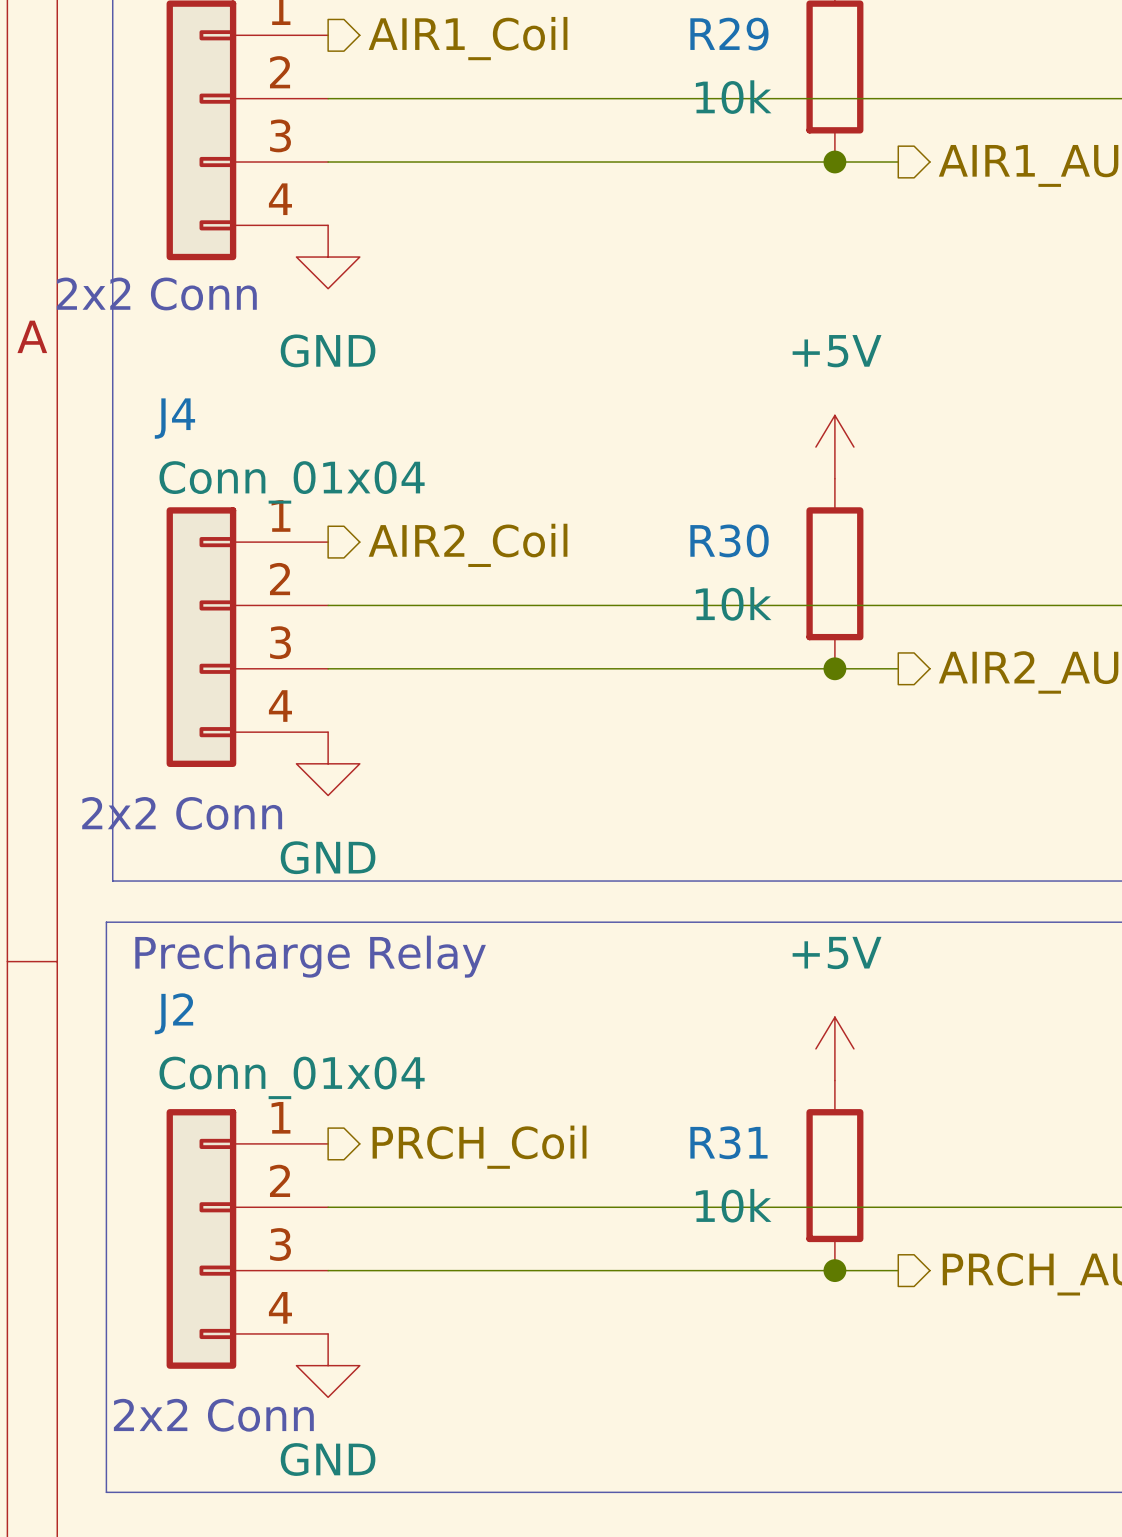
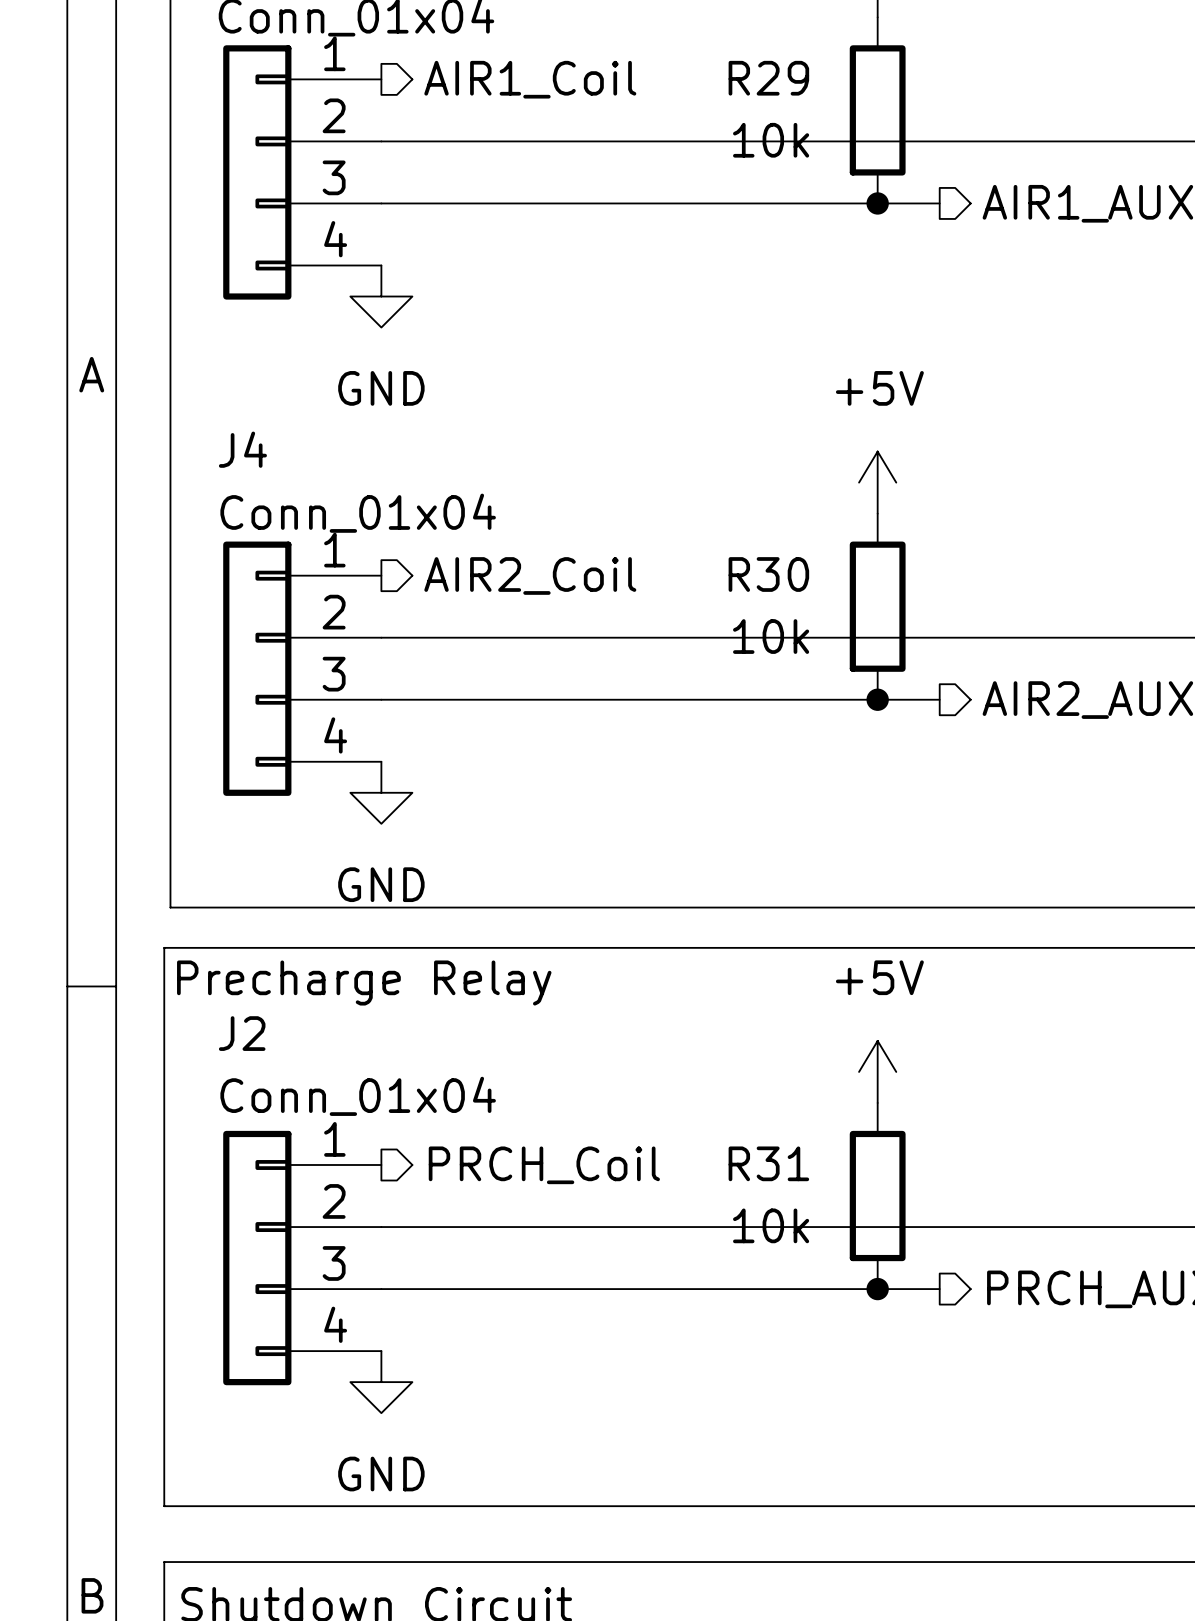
text: 2x2 Conn (156, 293) -> none
text: 2x2 Conn (182, 813) -> none
text: 2x2 Conn (213, 1415) -> none

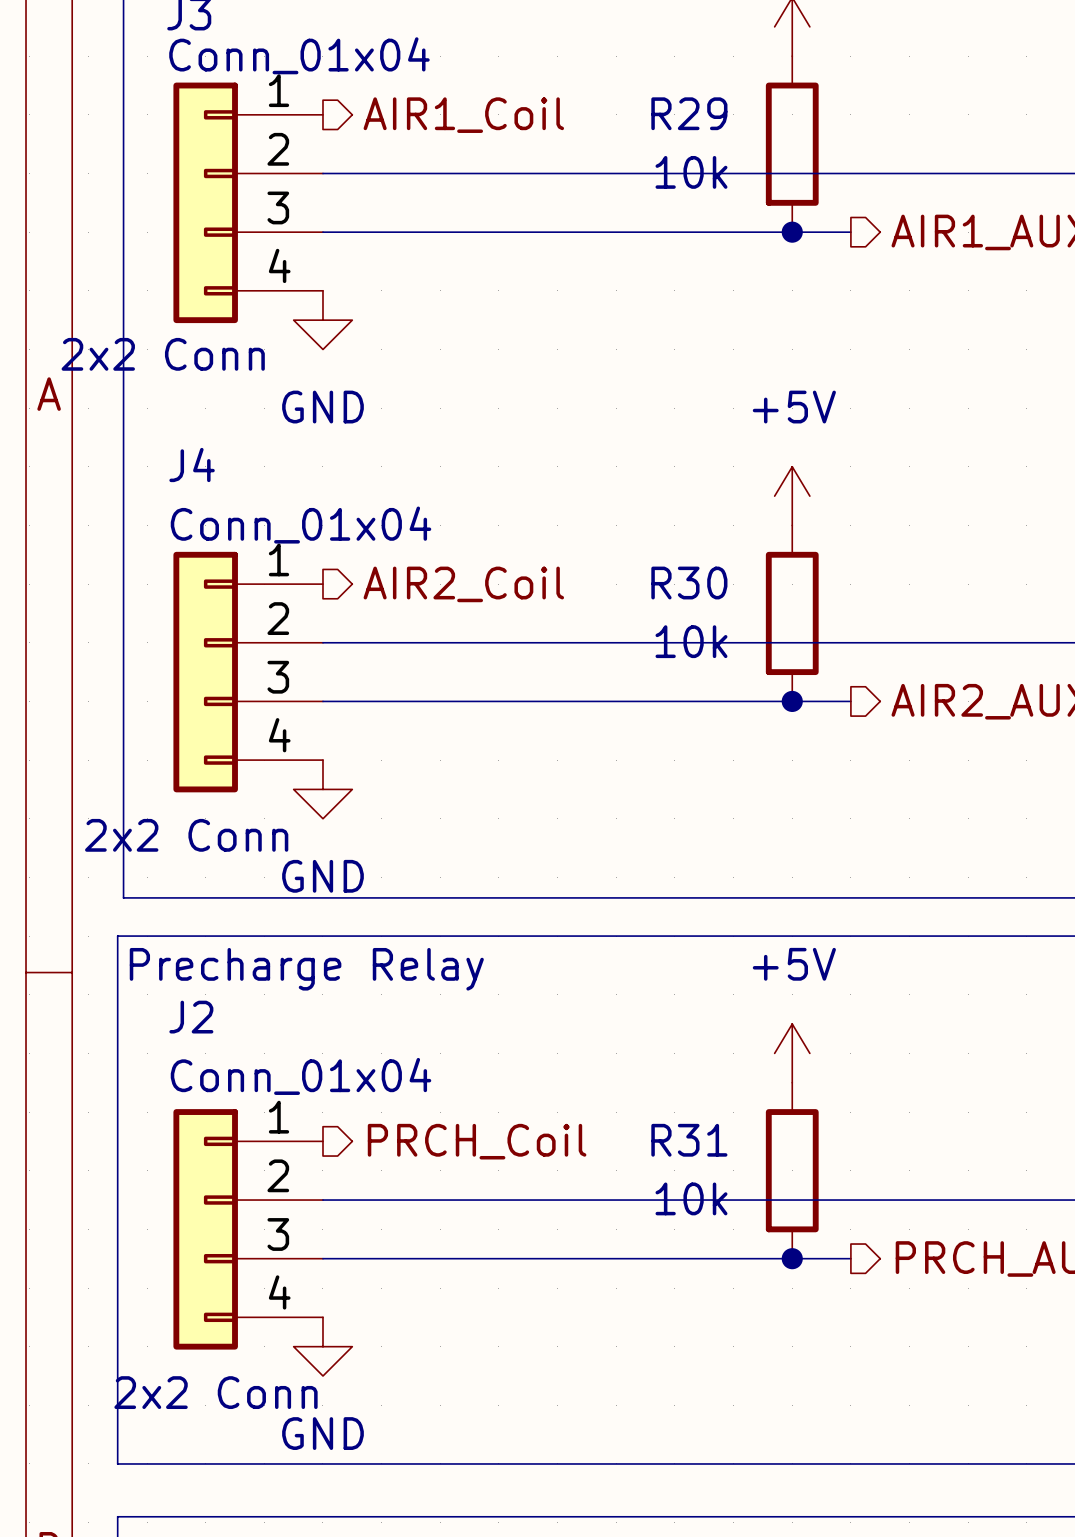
text: none -> 2x2 Conn (163, 354)
text: none -> 2x2 Conn (186, 835)
text: none -> 2x2 Conn (216, 1392)

